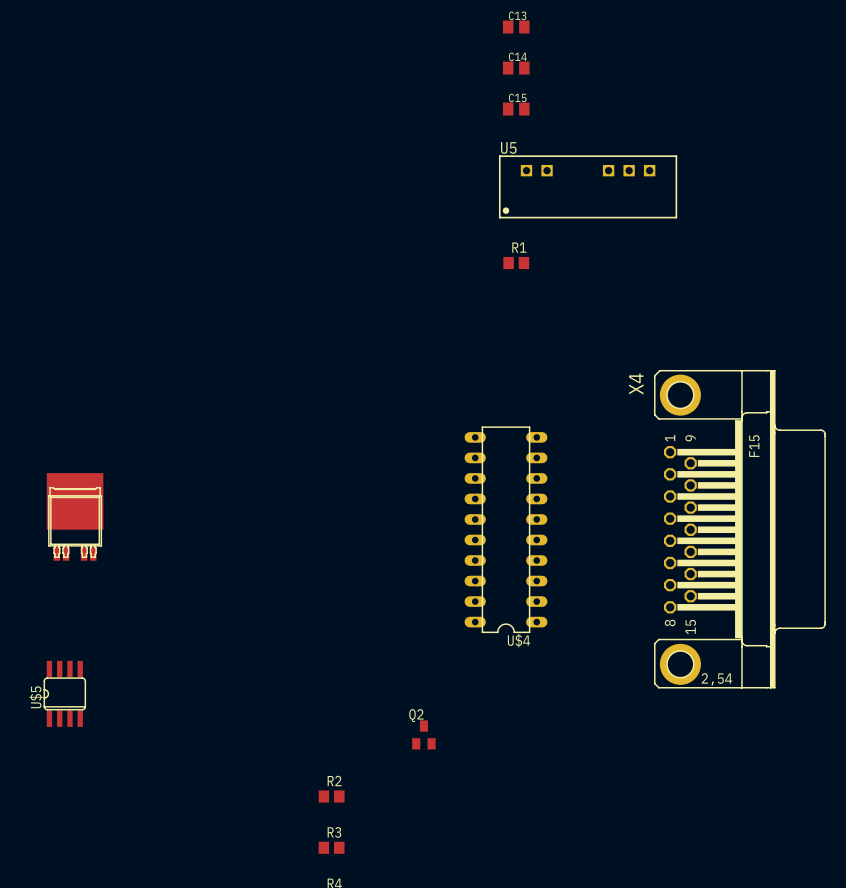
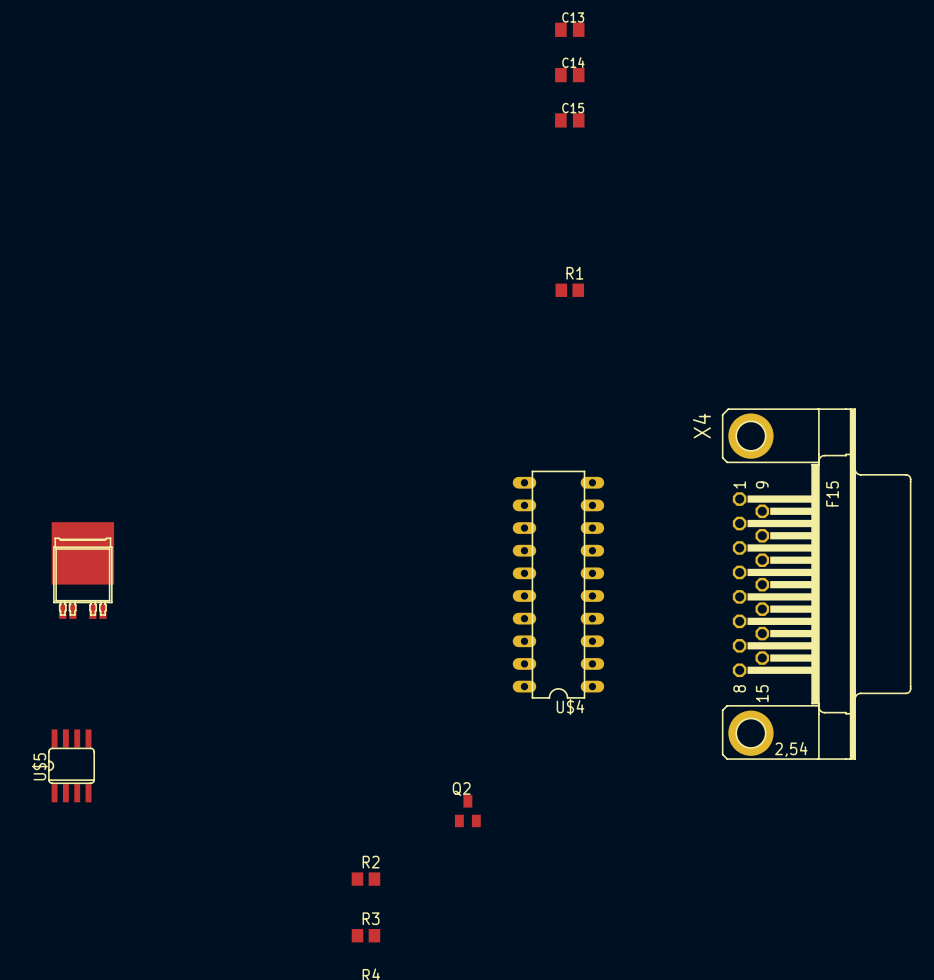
U5: (588, 186) -> none

